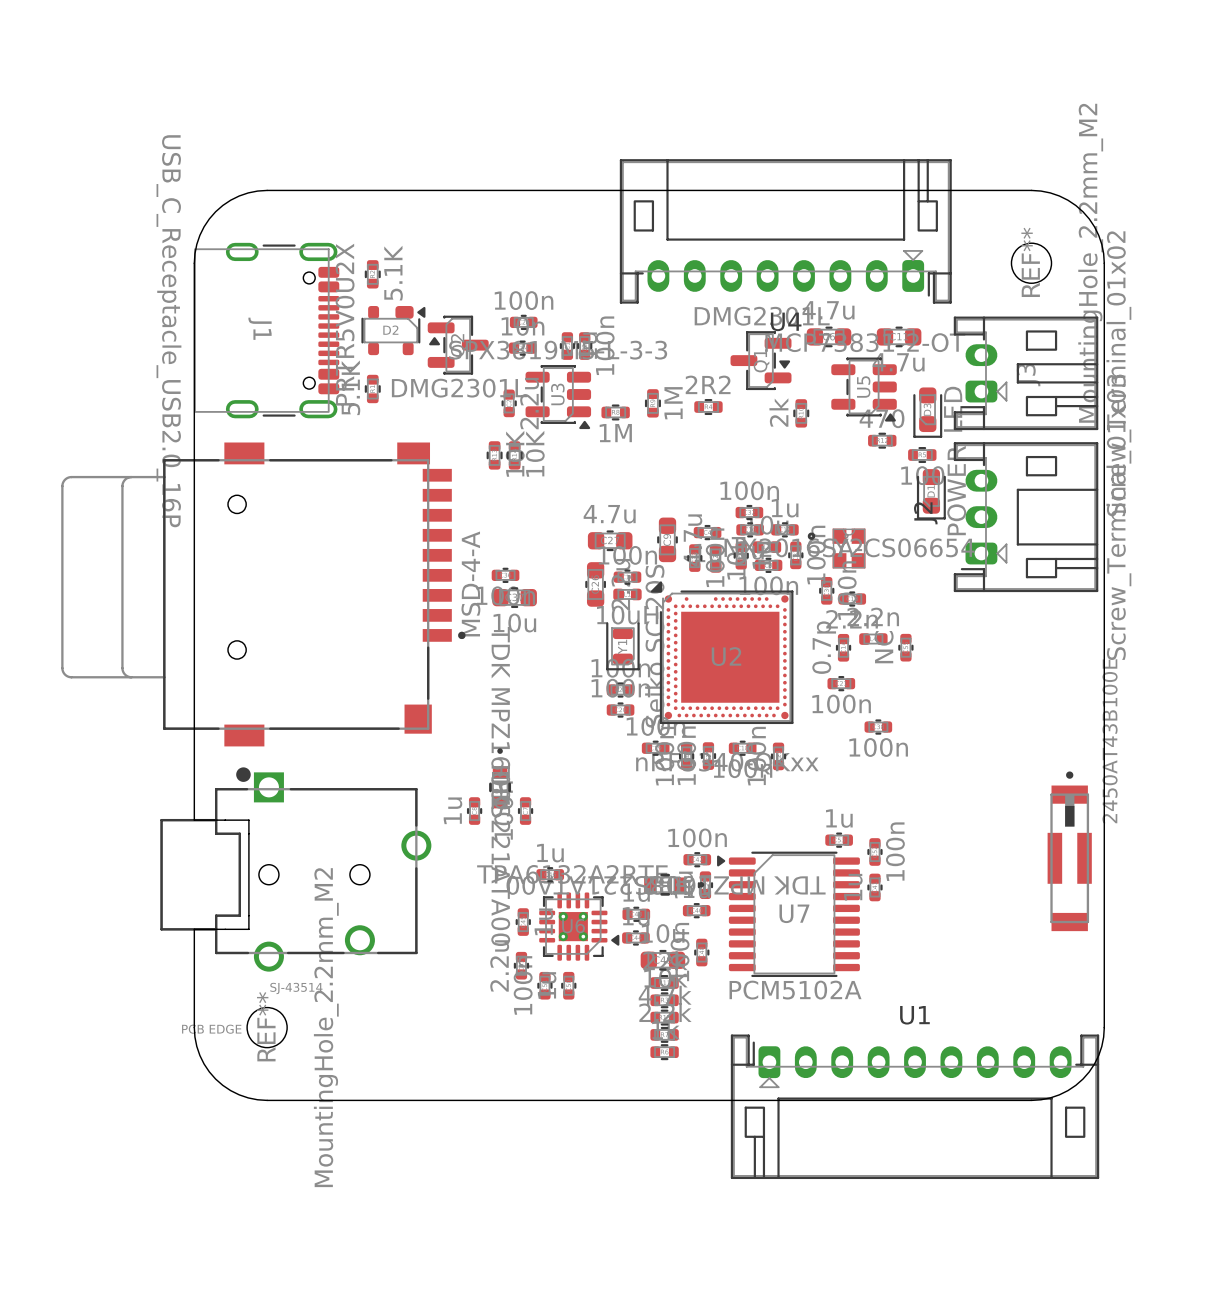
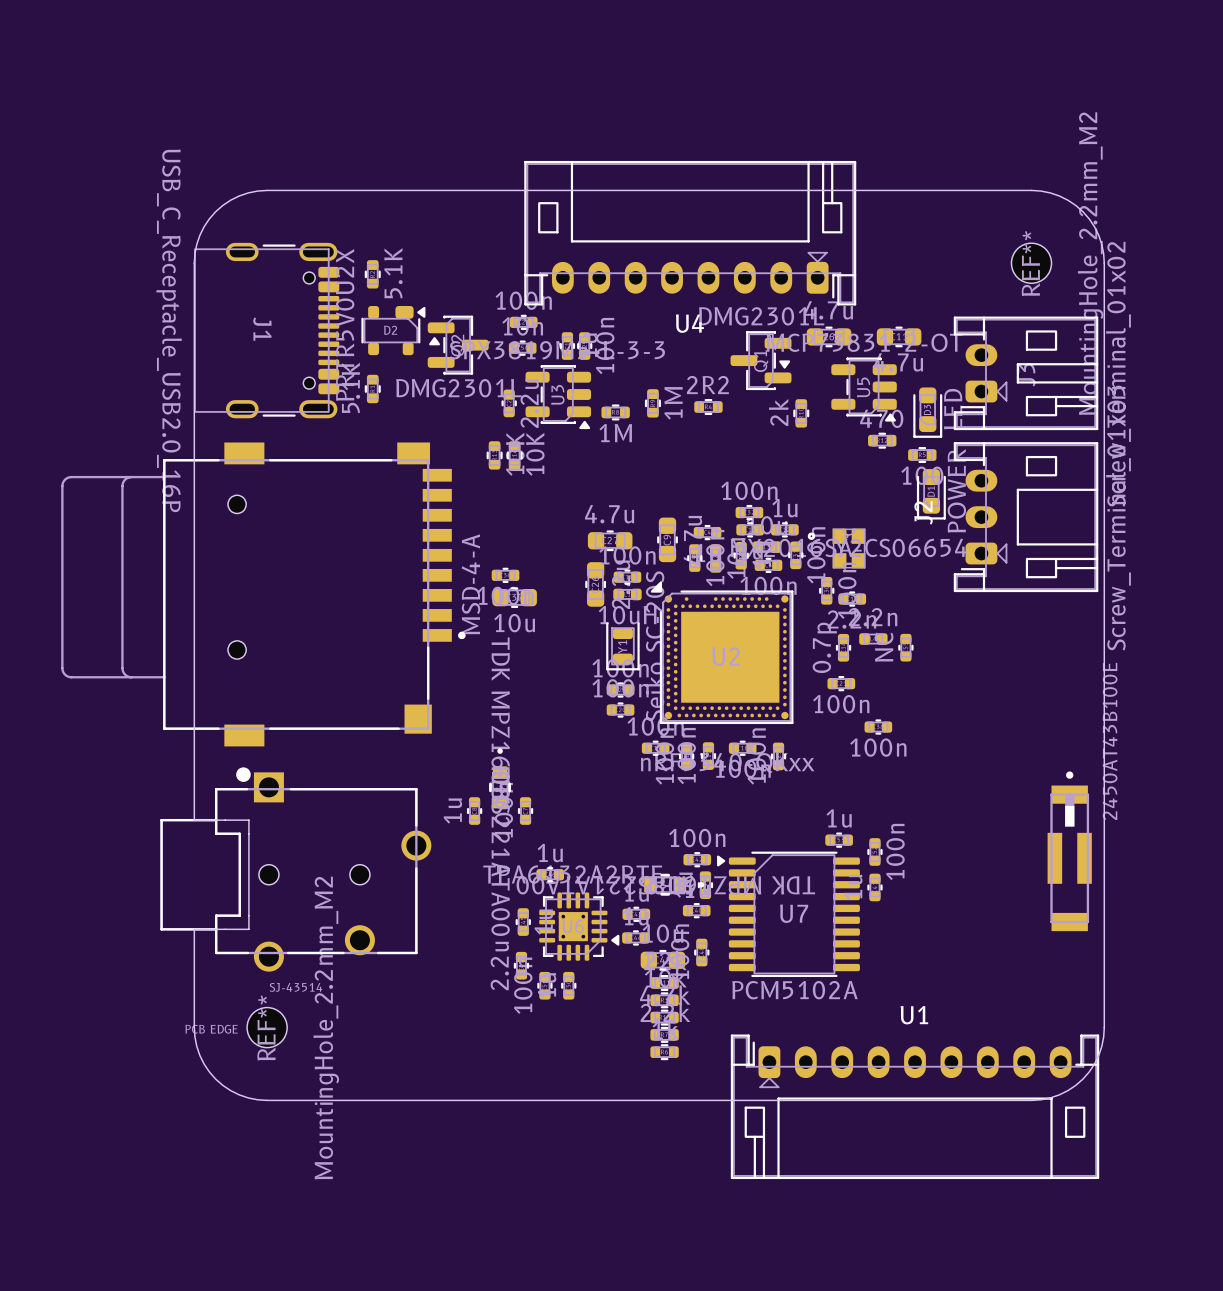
U4 position: (785, 231) -> (690, 233)

